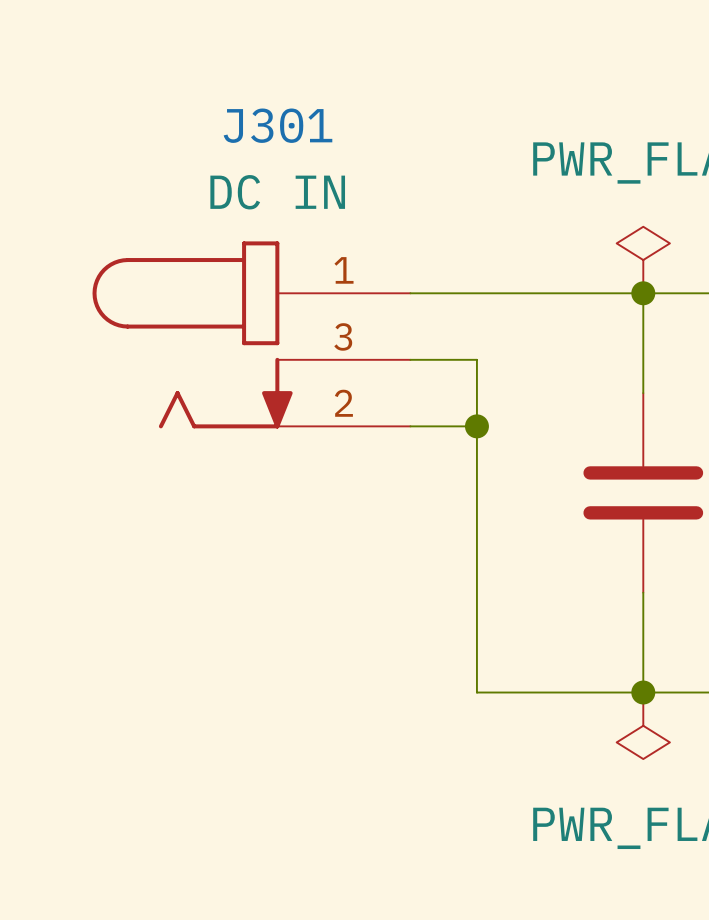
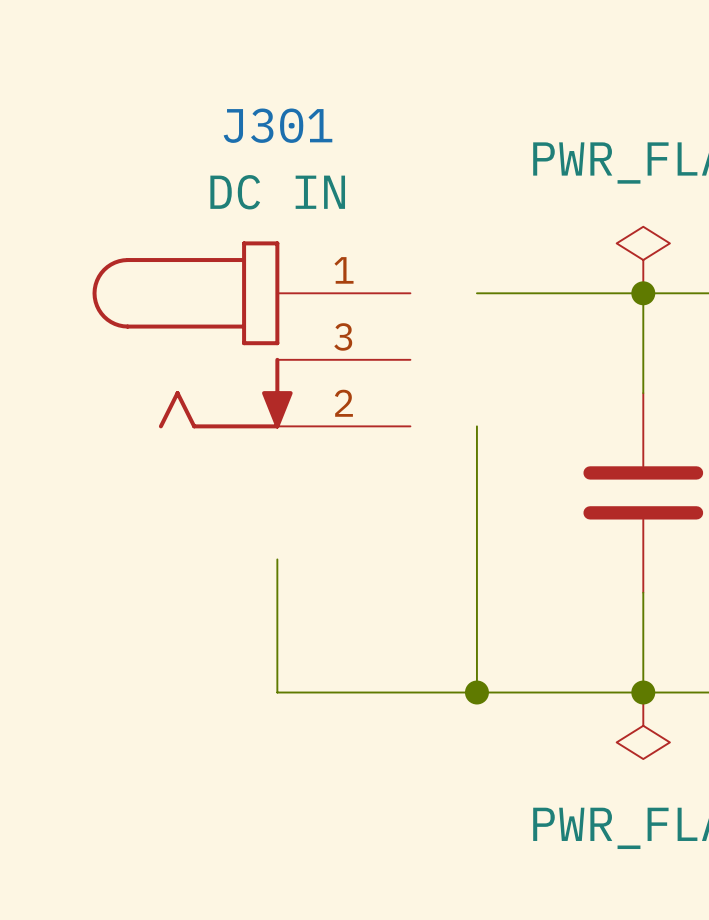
wire: (410, 293) (476, 293) -> none
wire: (410, 359) (476, 359) (476, 426) (410, 426) -> none
junction: (476, 426) -> none
wire: none -> (277, 559) (277, 692) (476, 692)
junction: none -> (476, 692)

